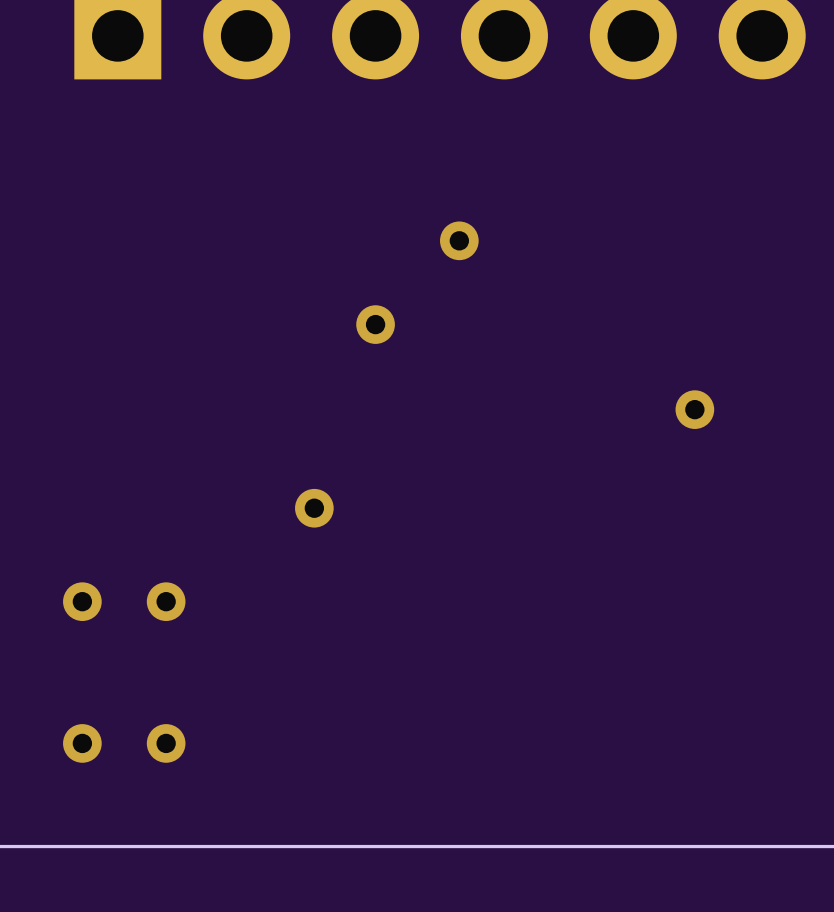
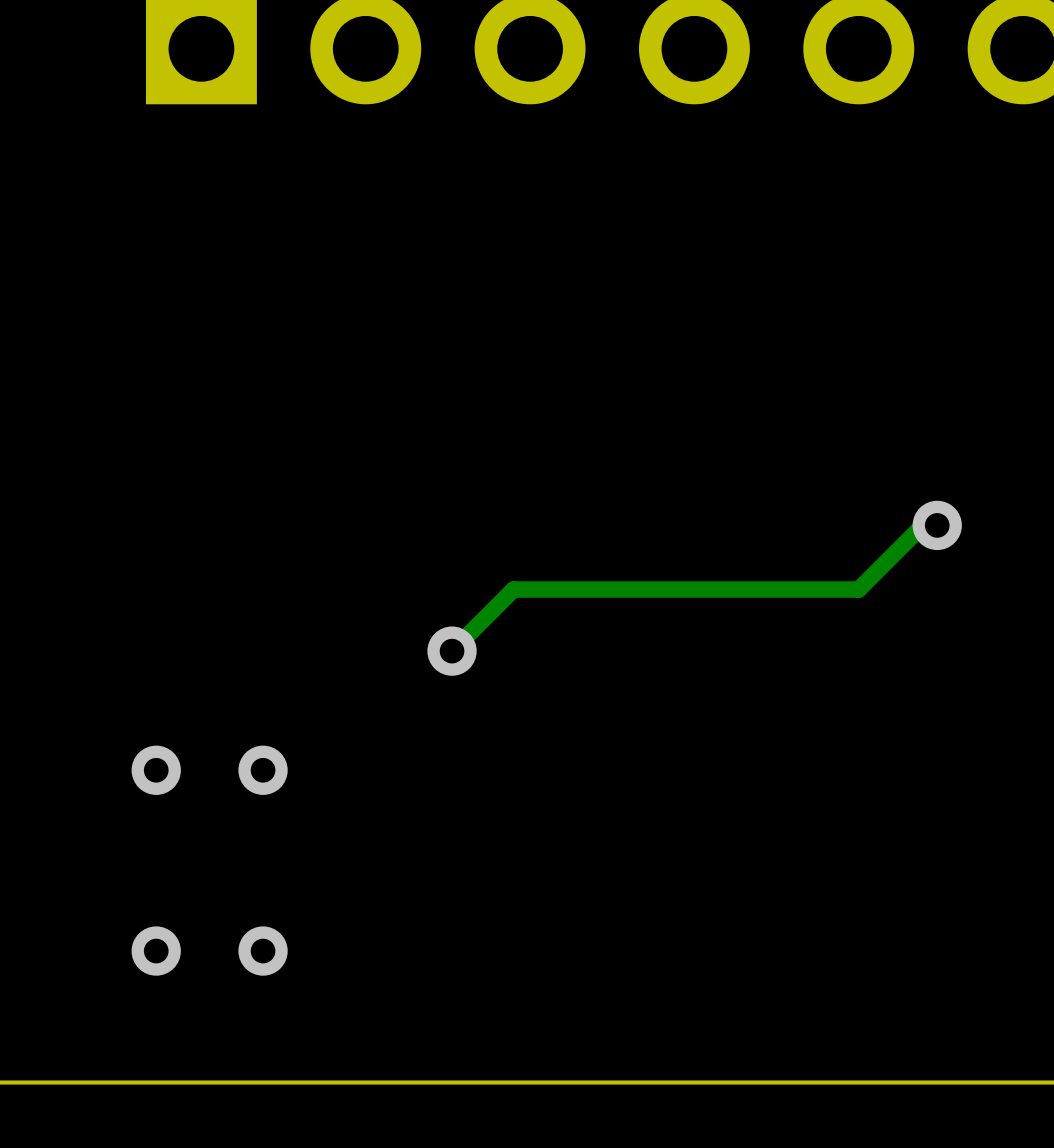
via: (459, 240) -> none
via: (375, 324) -> none
track: none -> (937, 525) (922, 525) (858, 589) (513, 589) (452, 651)

